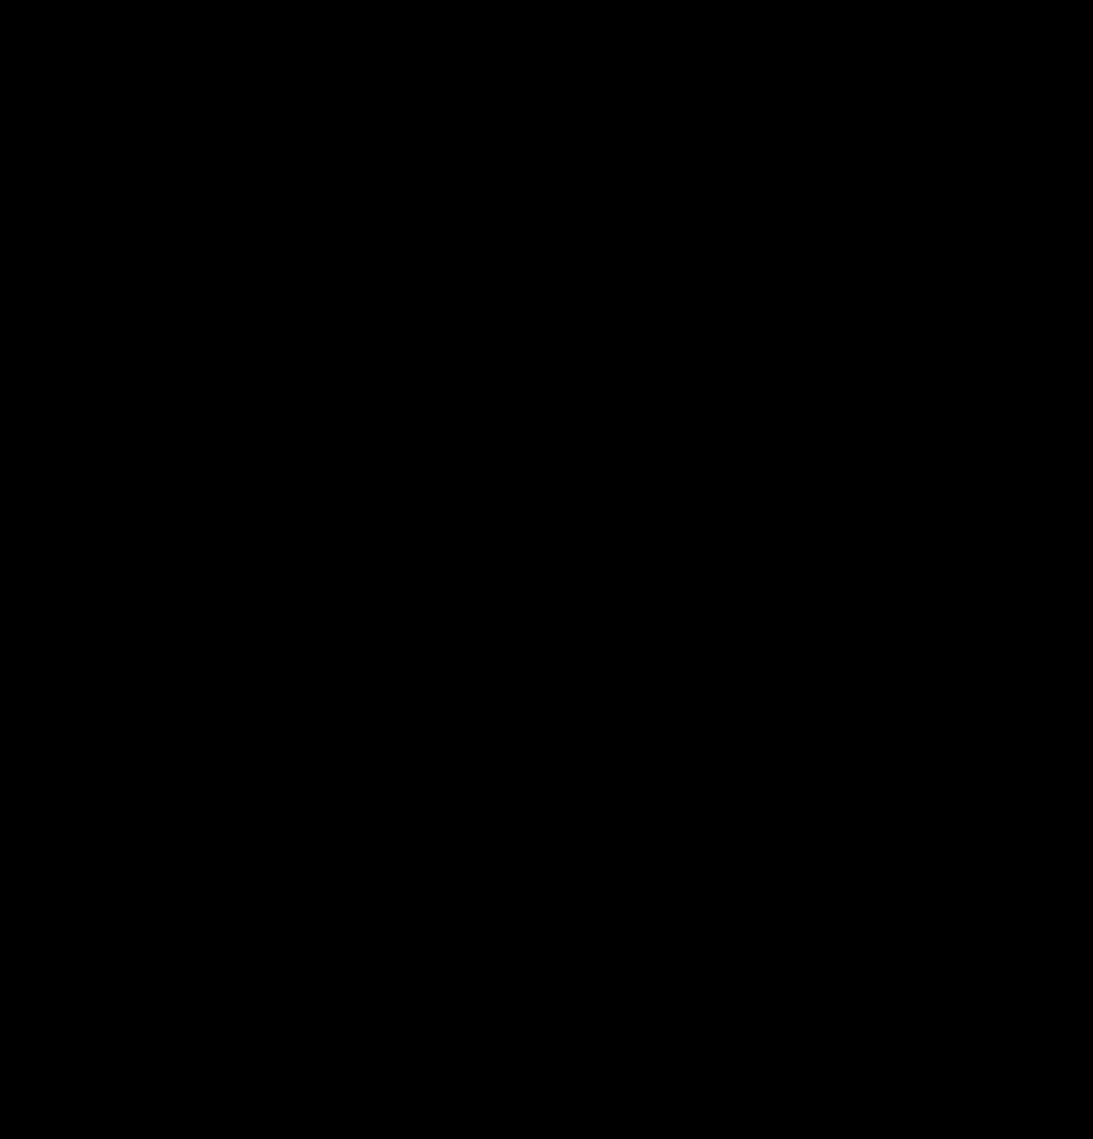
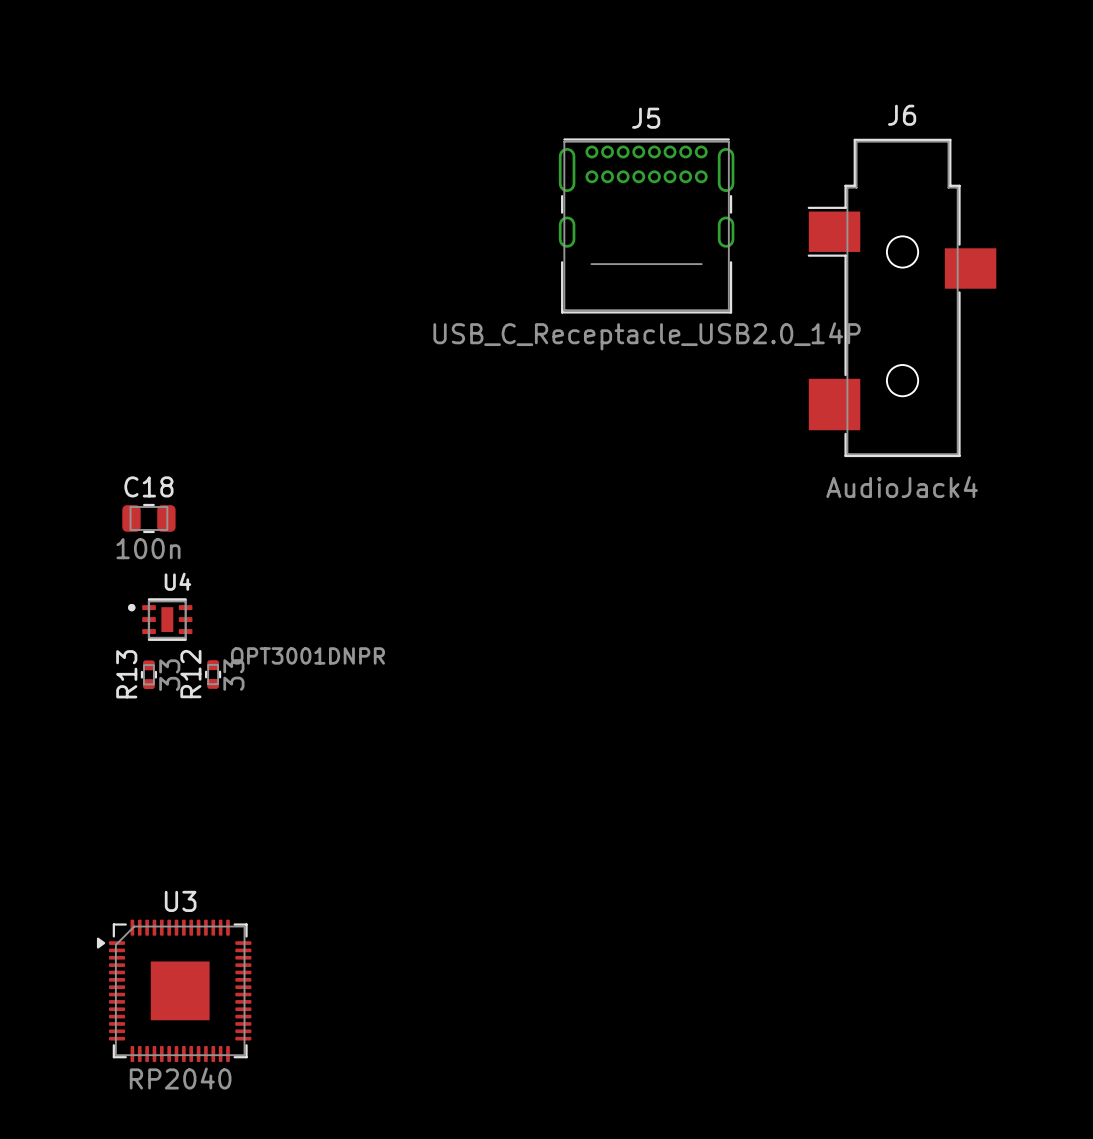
J5: none -> USB_C_Receptacle_USB2.0_14P (646, 225)
J6: none -> AudioJack4 (901, 297)
C18: none -> 100n (148, 518)
U4: none -> OPT3001DNPR (160, 619)
R13: none -> 33 (148, 674)
R12: none -> 33 (213, 674)
U3: none -> RP2040 (174, 990)

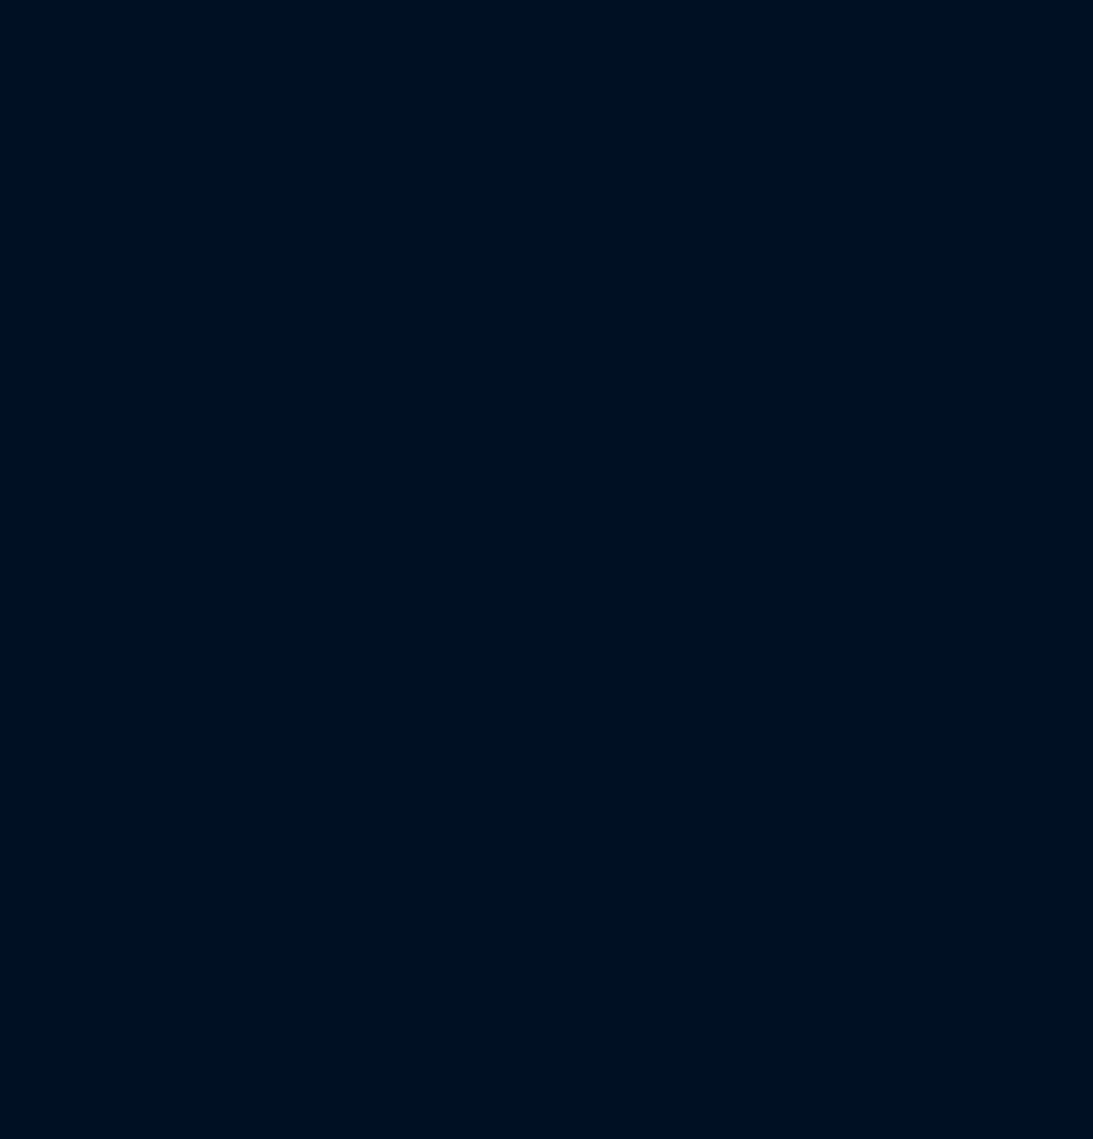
J5: USB_C_Receptacle_USB2.0_14P (646, 225) -> none
J6: AudioJack4 (901, 297) -> none
C18: 100n (148, 518) -> none
U4: OPT3001DNPR (160, 619) -> none
R13: 33 (148, 674) -> none
R12: 33 (213, 674) -> none
U3: RP2040 (174, 990) -> none

